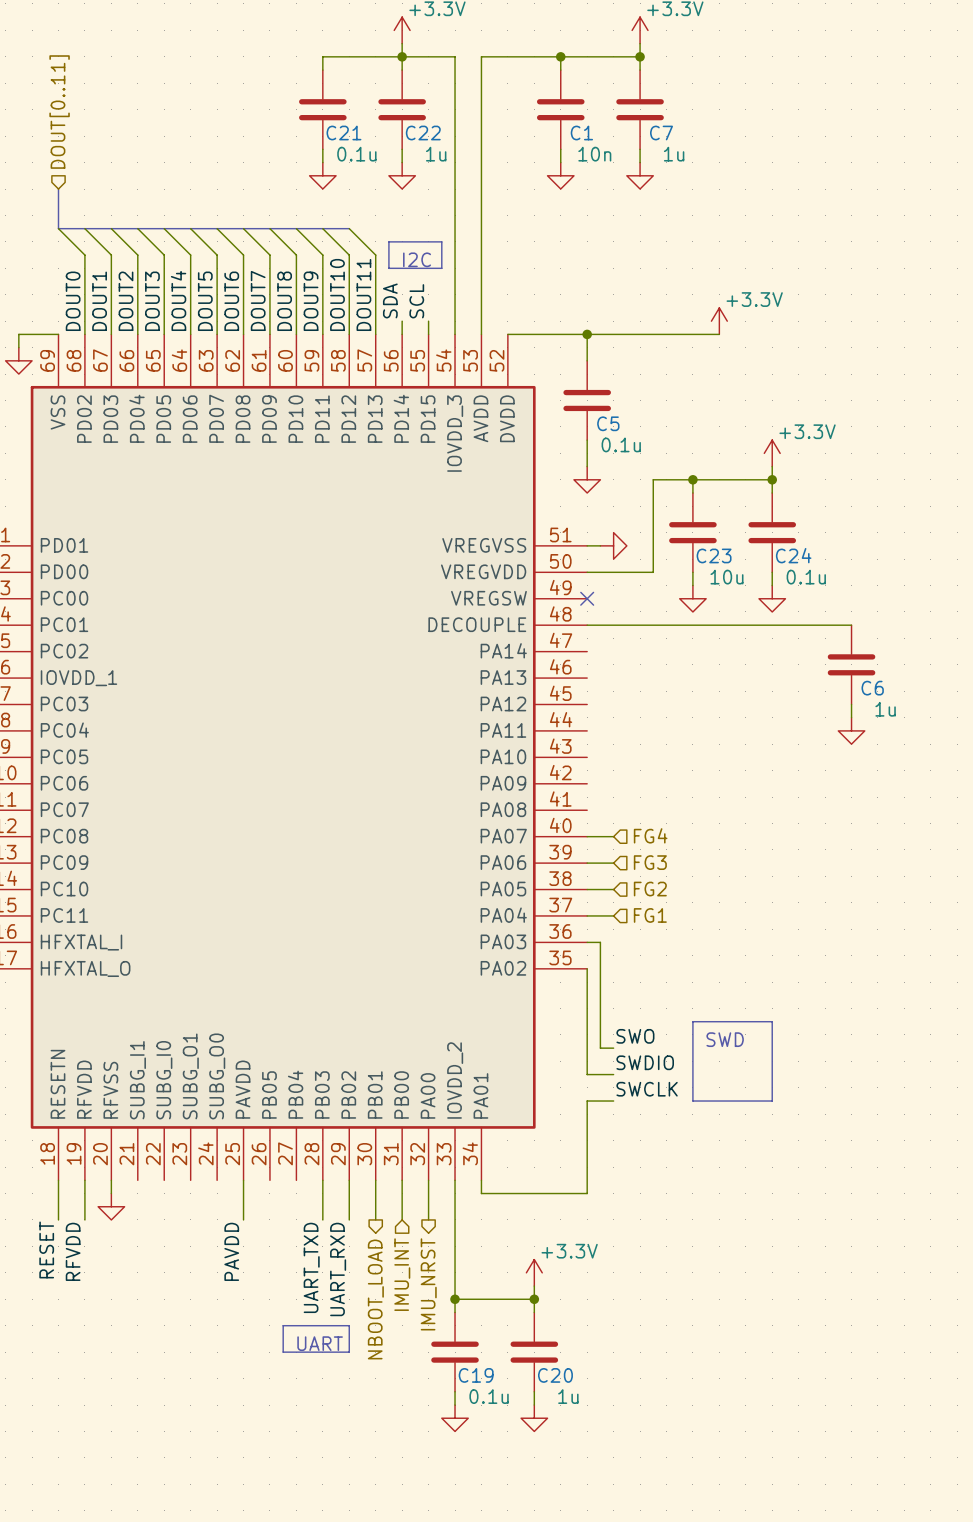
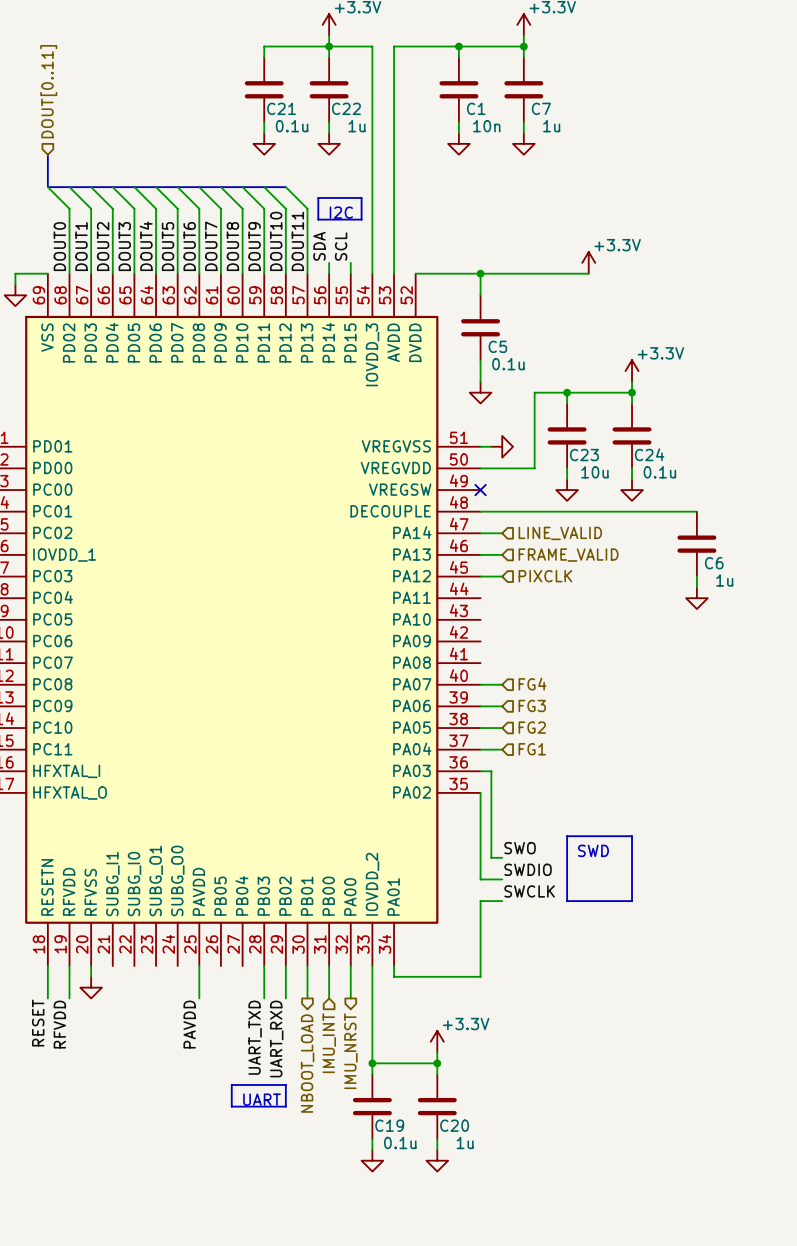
wire: none -> (480, 533) (502, 533)
hierarchical label: none -> LINE_VALID (560, 533)
wire: none -> (480, 554) (502, 554)
hierarchical label: none -> FRAME_VALID (568, 555)
hierarchical label: none -> PIXCLK (545, 576)
wire: none -> (480, 576) (502, 576)

